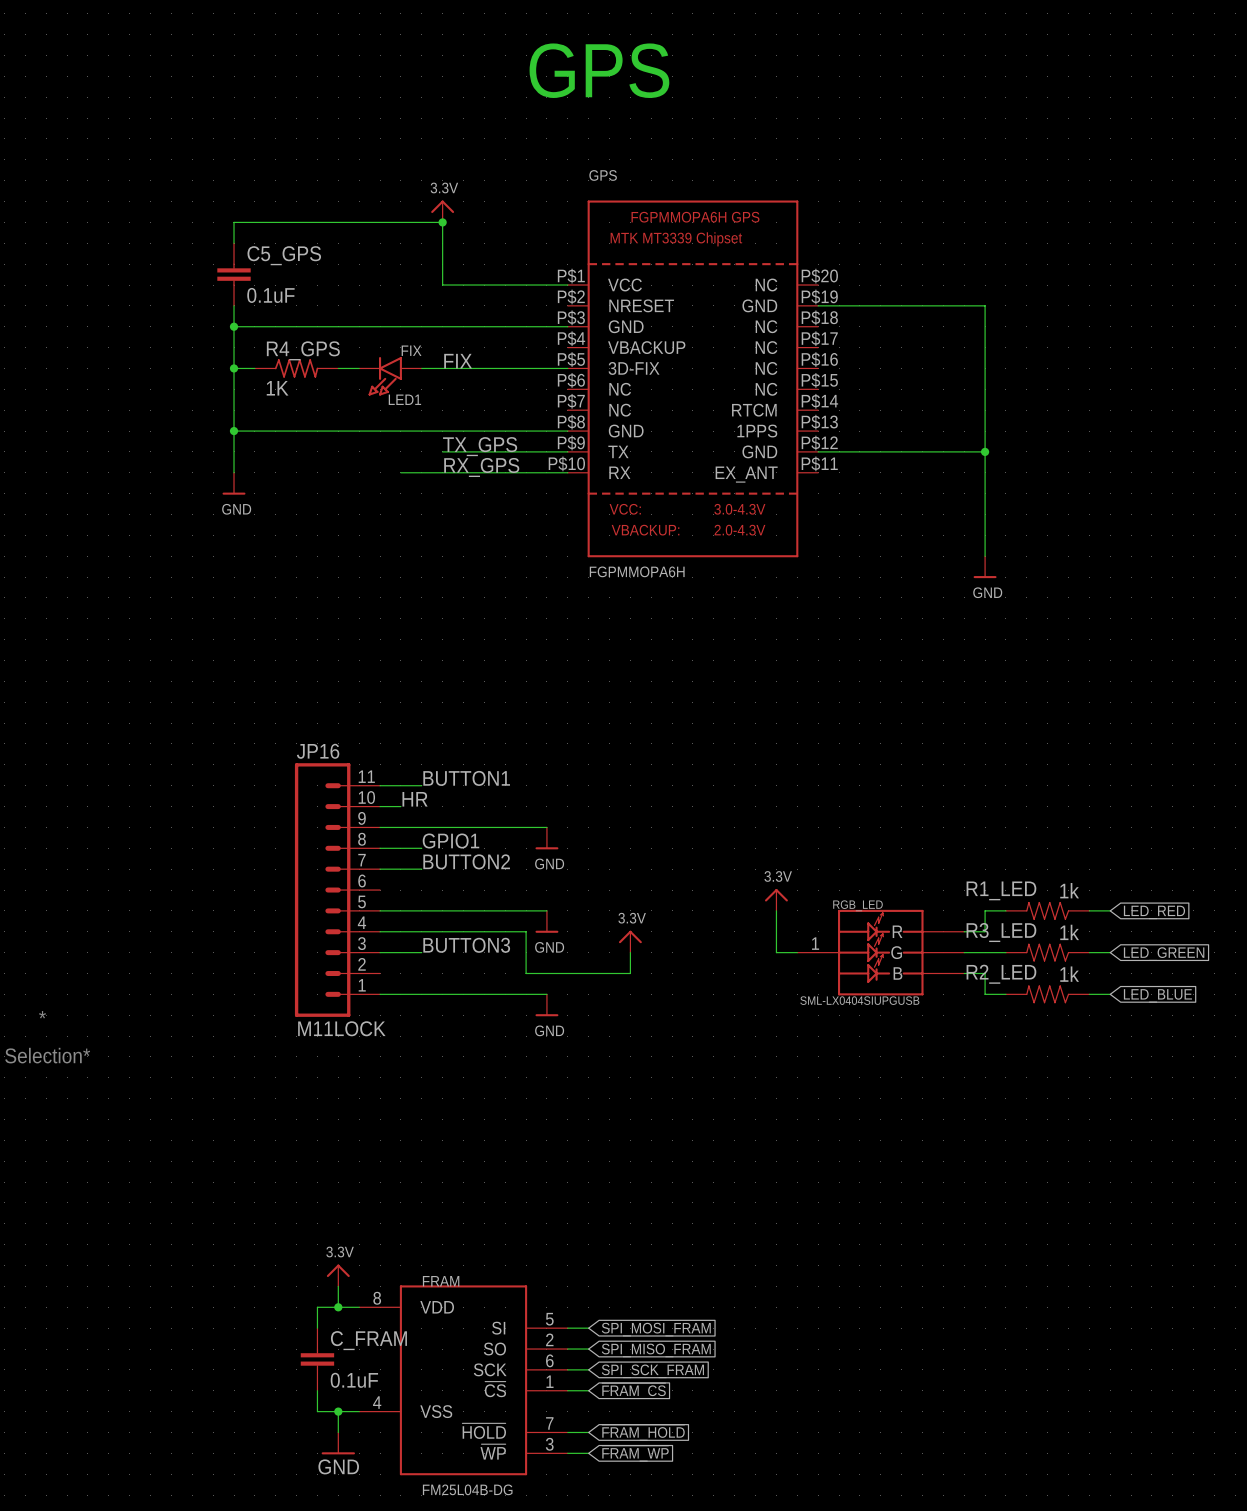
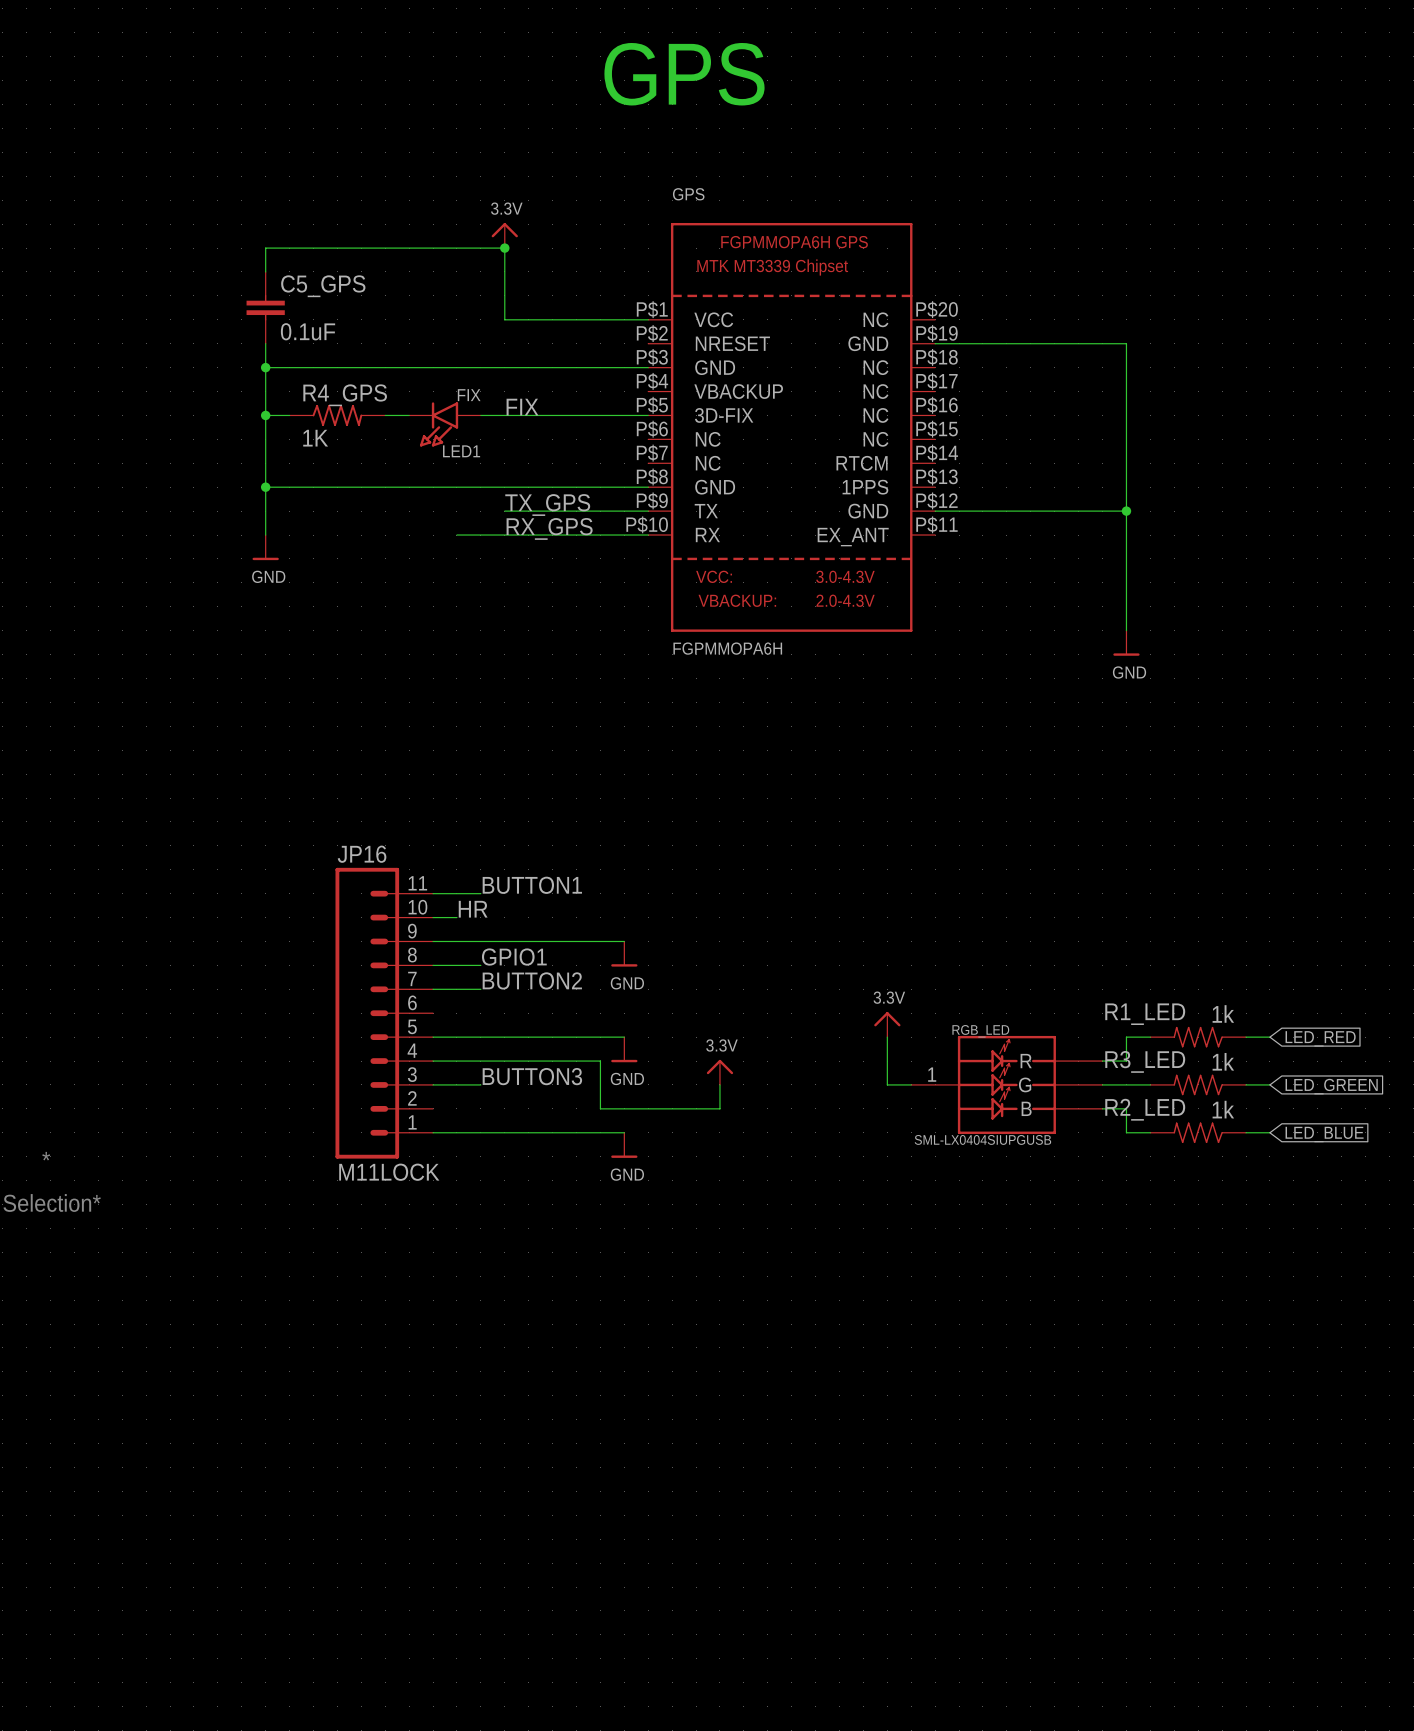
power symbol: 3.3V (338, 1275) -> none
wire: (338, 1286) (338, 1307) -> none
junction: (338, 1307) -> none
wire: (359, 1307) (317, 1307) (317, 1328) -> none
wire: (567, 1328) (588, 1328) -> none
global label: SPI_MOSI_FRAM (656, 1329) -> none
wire: (567, 1349) (588, 1349) -> none
global label: SPI_MISO_FRAM (656, 1350) -> none
C_FRAM: 0.1uF (317, 1359) -> none
wire: (567, 1369) (588, 1369) -> none
global label: SPI_SCK_FRAM (652, 1371) -> none
FRAM: FM25L04B-DG (463, 1380) -> none
wire: (317, 1390) (317, 1411) (359, 1411) -> none
wire: (567, 1390) (588, 1390) -> none
global label: ~{FRAM_CS} (633, 1391) -> none
wire: (338, 1411) (338, 1432) -> none
junction: (338, 1411) -> none
wire: (567, 1432) (588, 1432) -> none
global label: ~{FRAM_HOLD} (643, 1432) -> none
power symbol: GND (338, 1443) -> none
wire: (567, 1453) (588, 1453) -> none
global label: ~{FRAM_WP} (635, 1453) -> none

